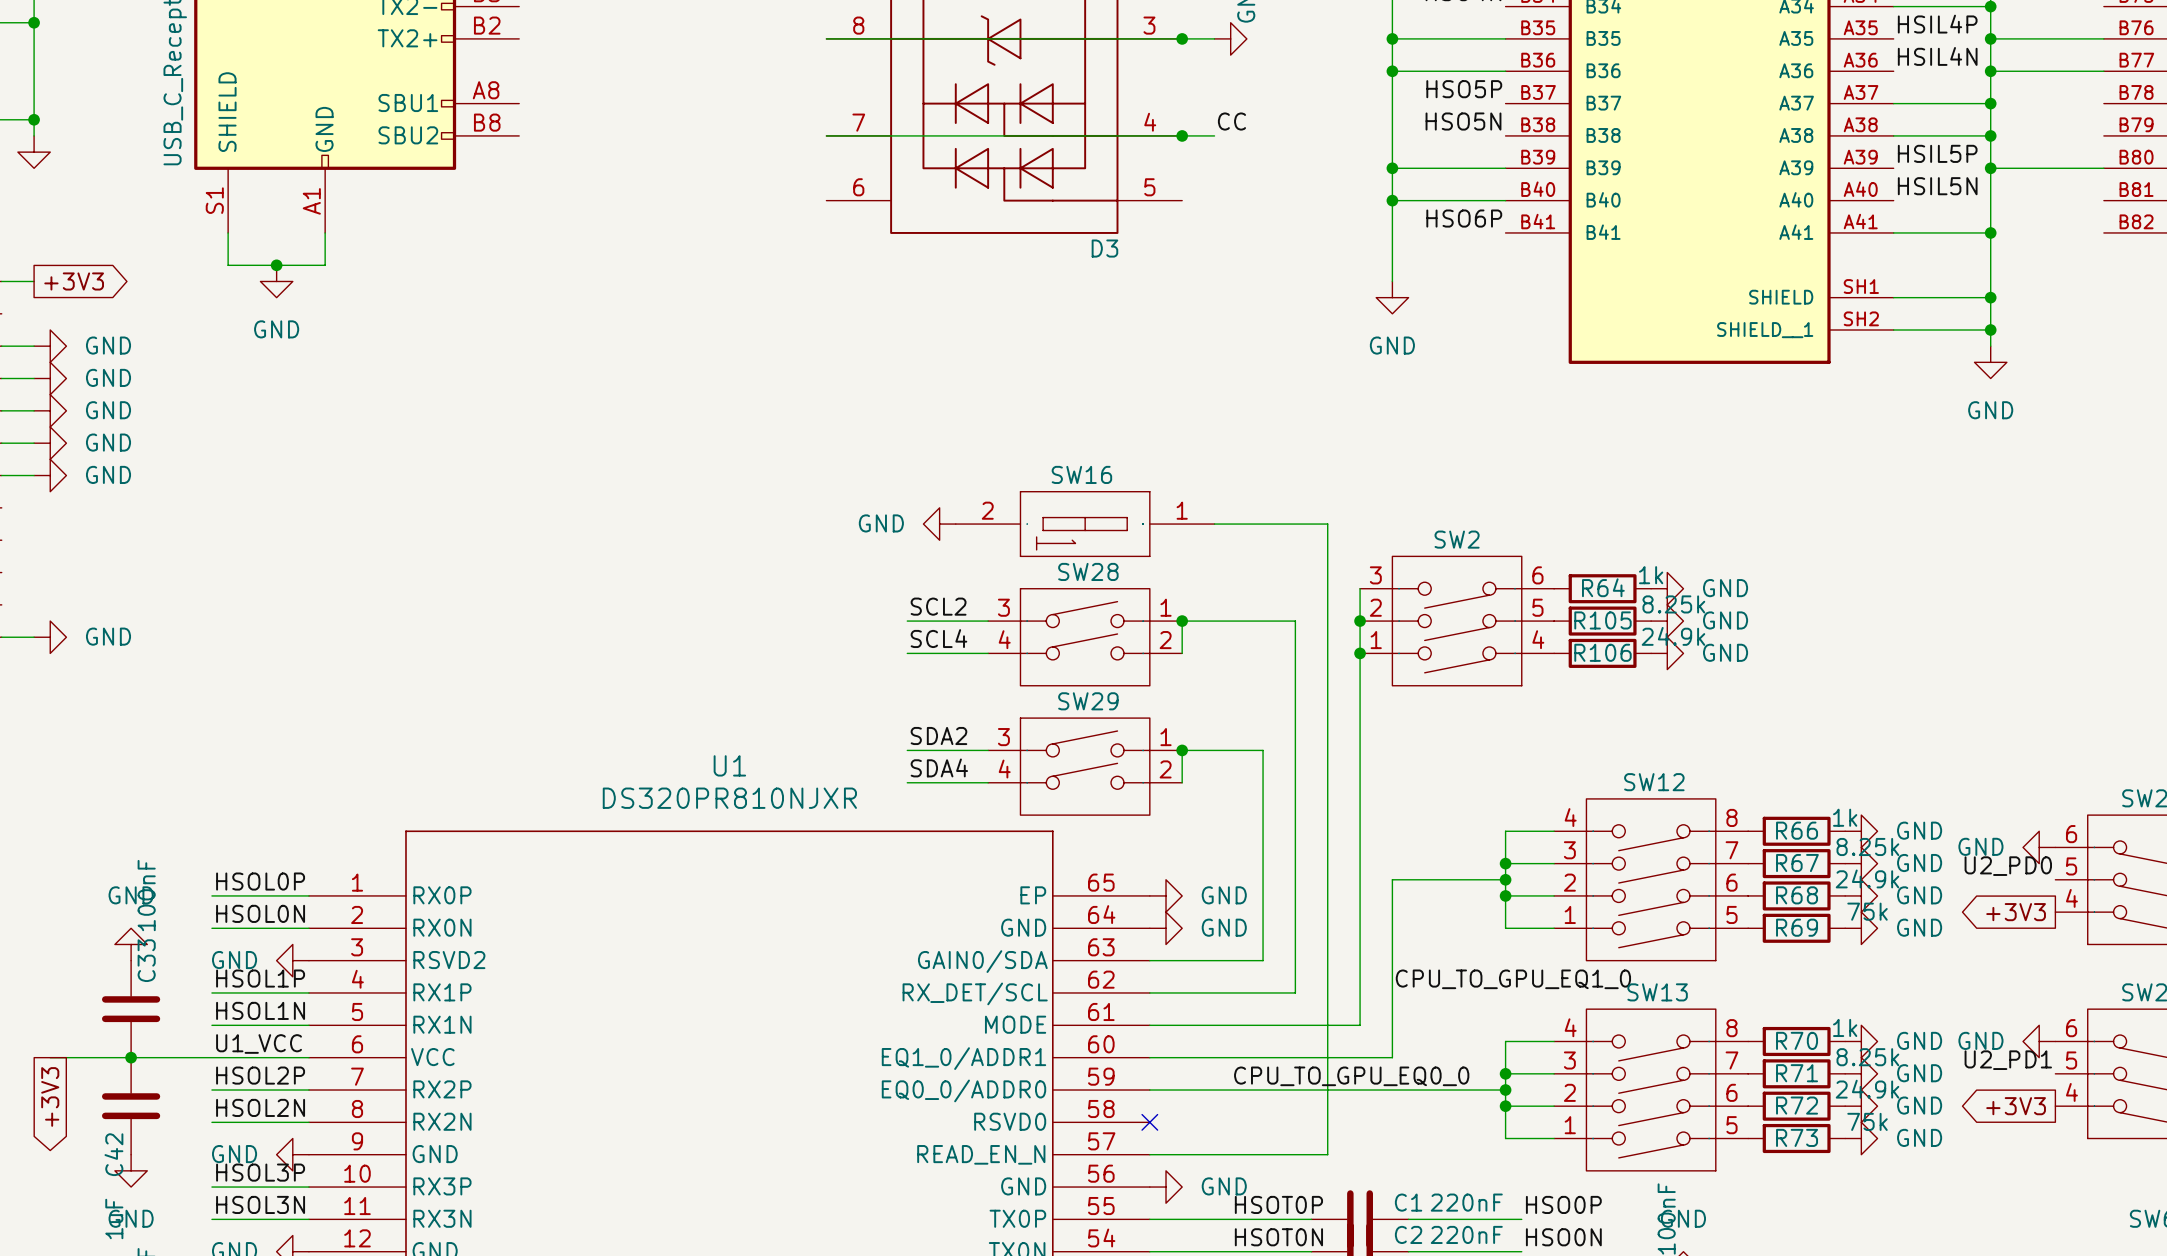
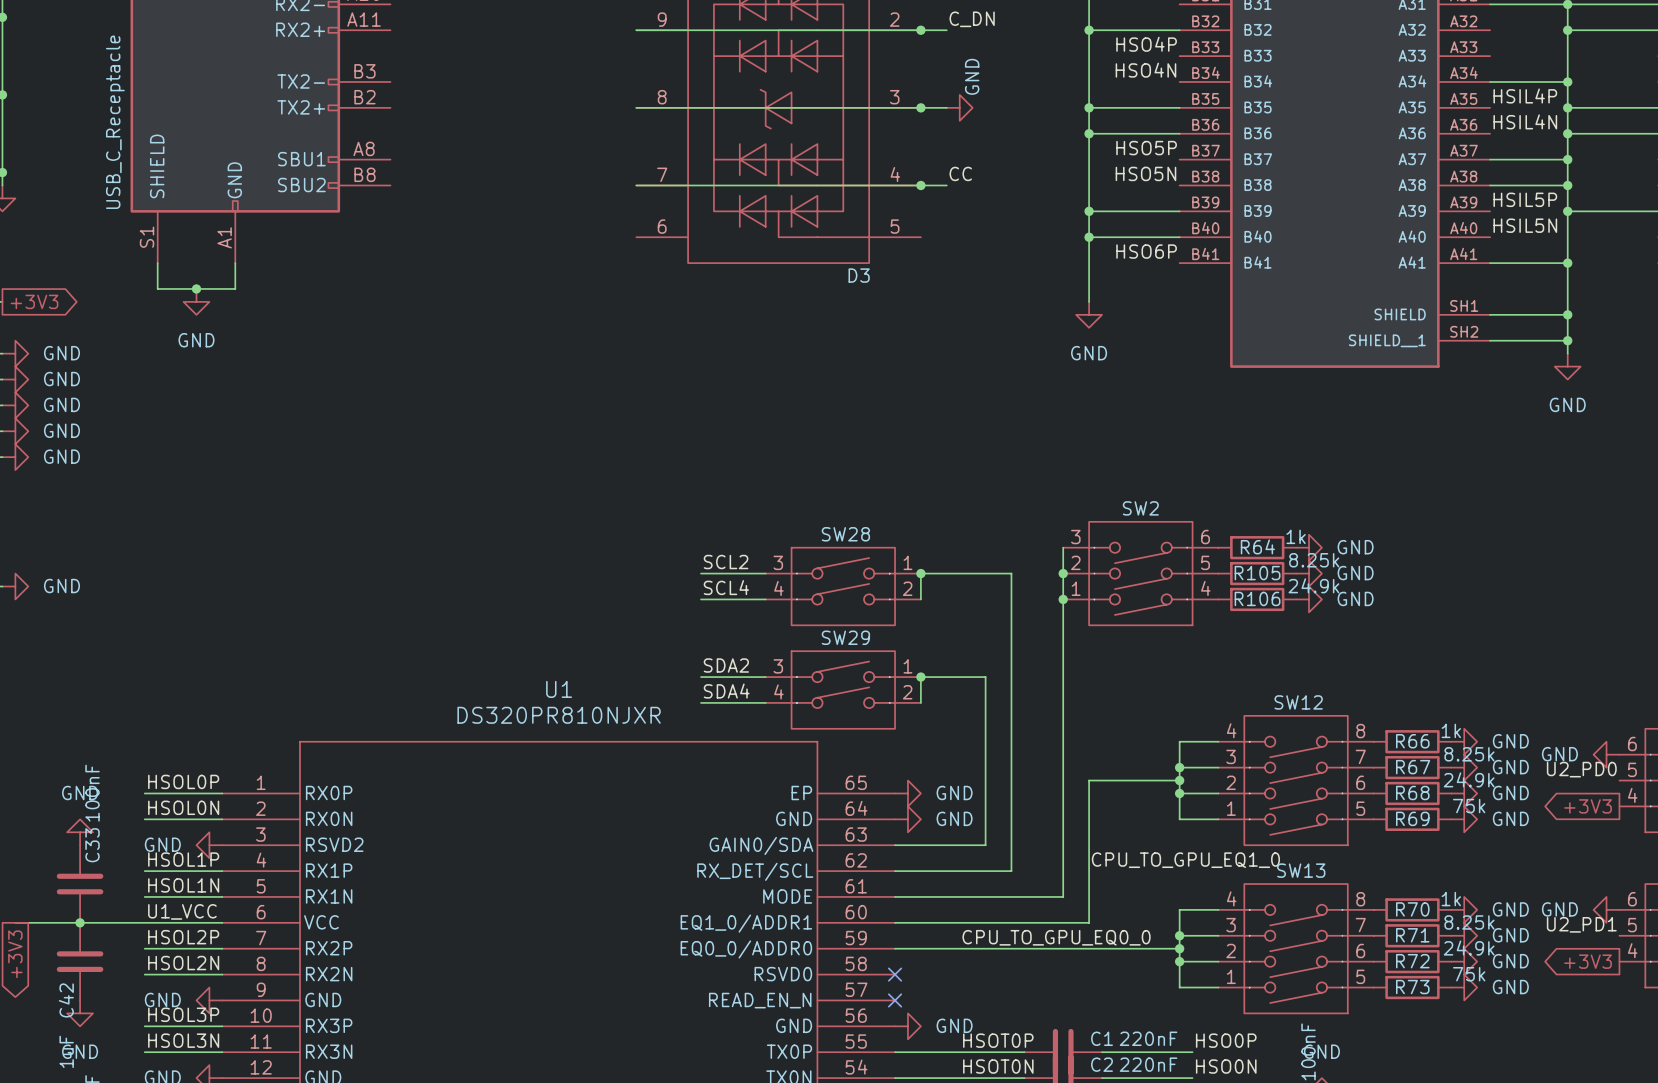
power symbol: GND (939, 524) -> none
SW16: (1085, 524) -> none
wire: (1214, 524) (1327, 524) (1327, 1154) (1149, 1154) -> none
no-connect mark: none -> (895, 1000)

